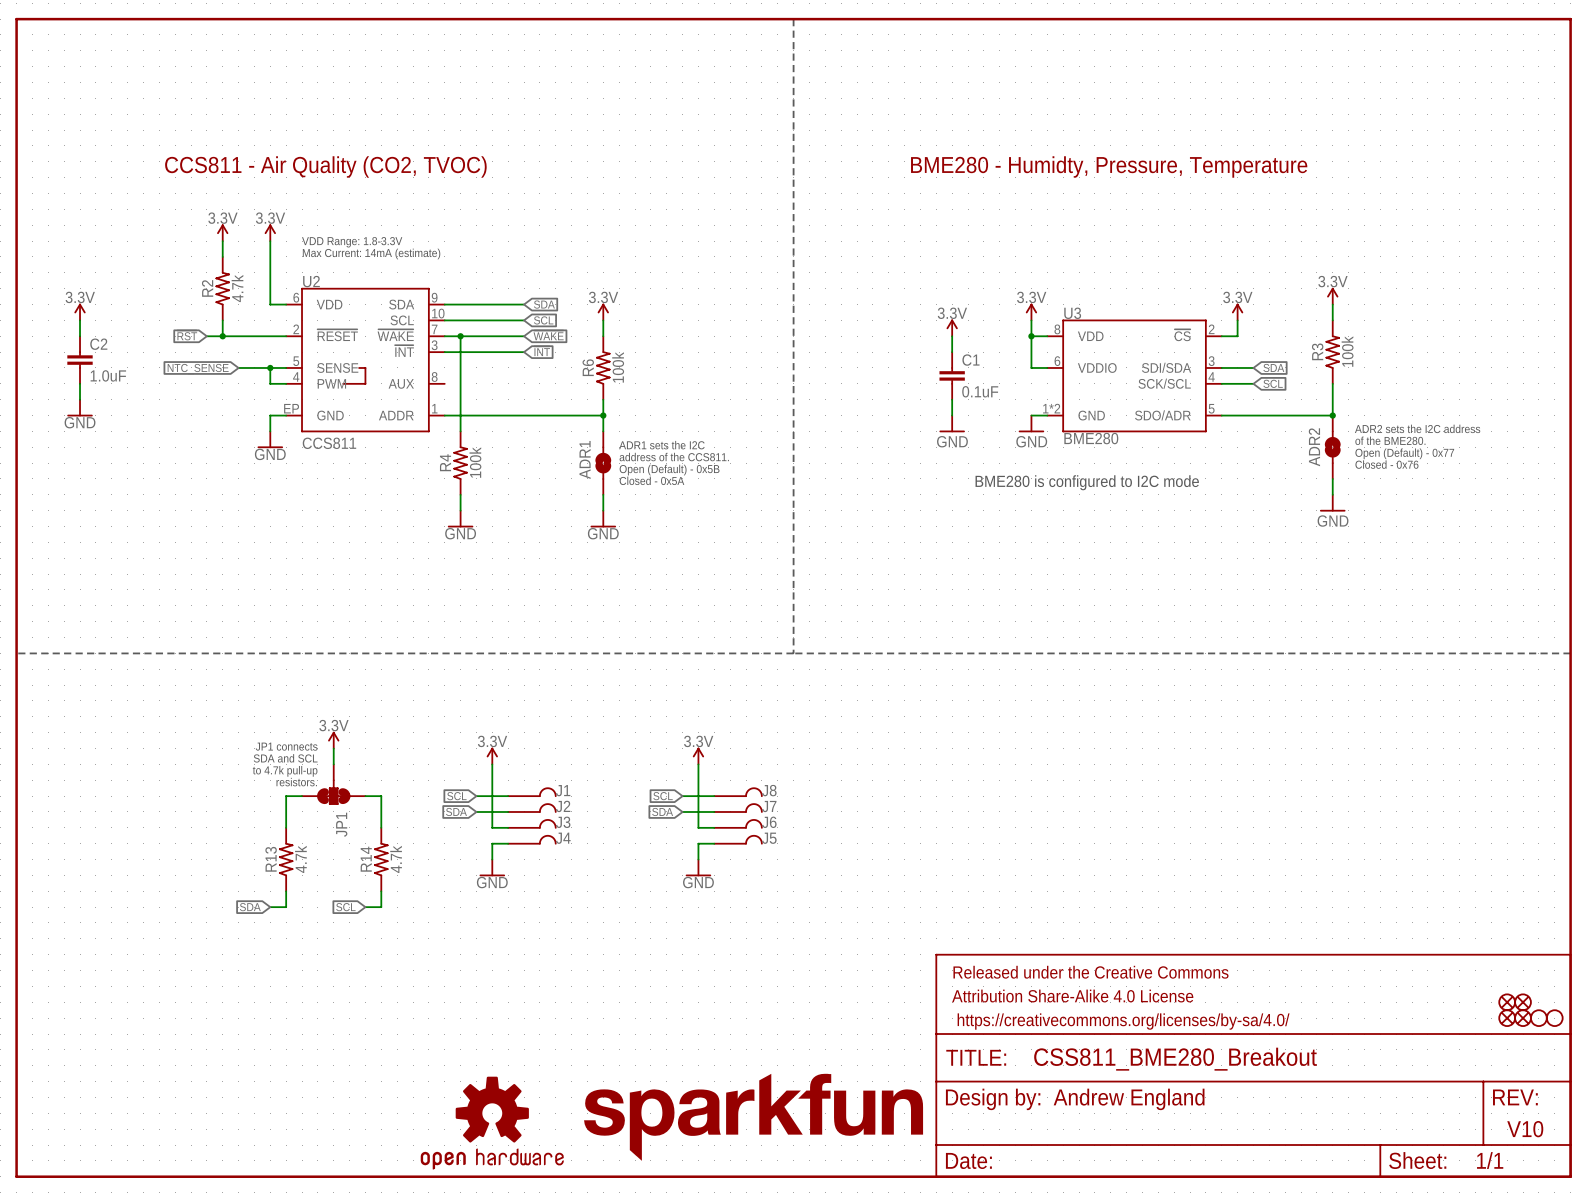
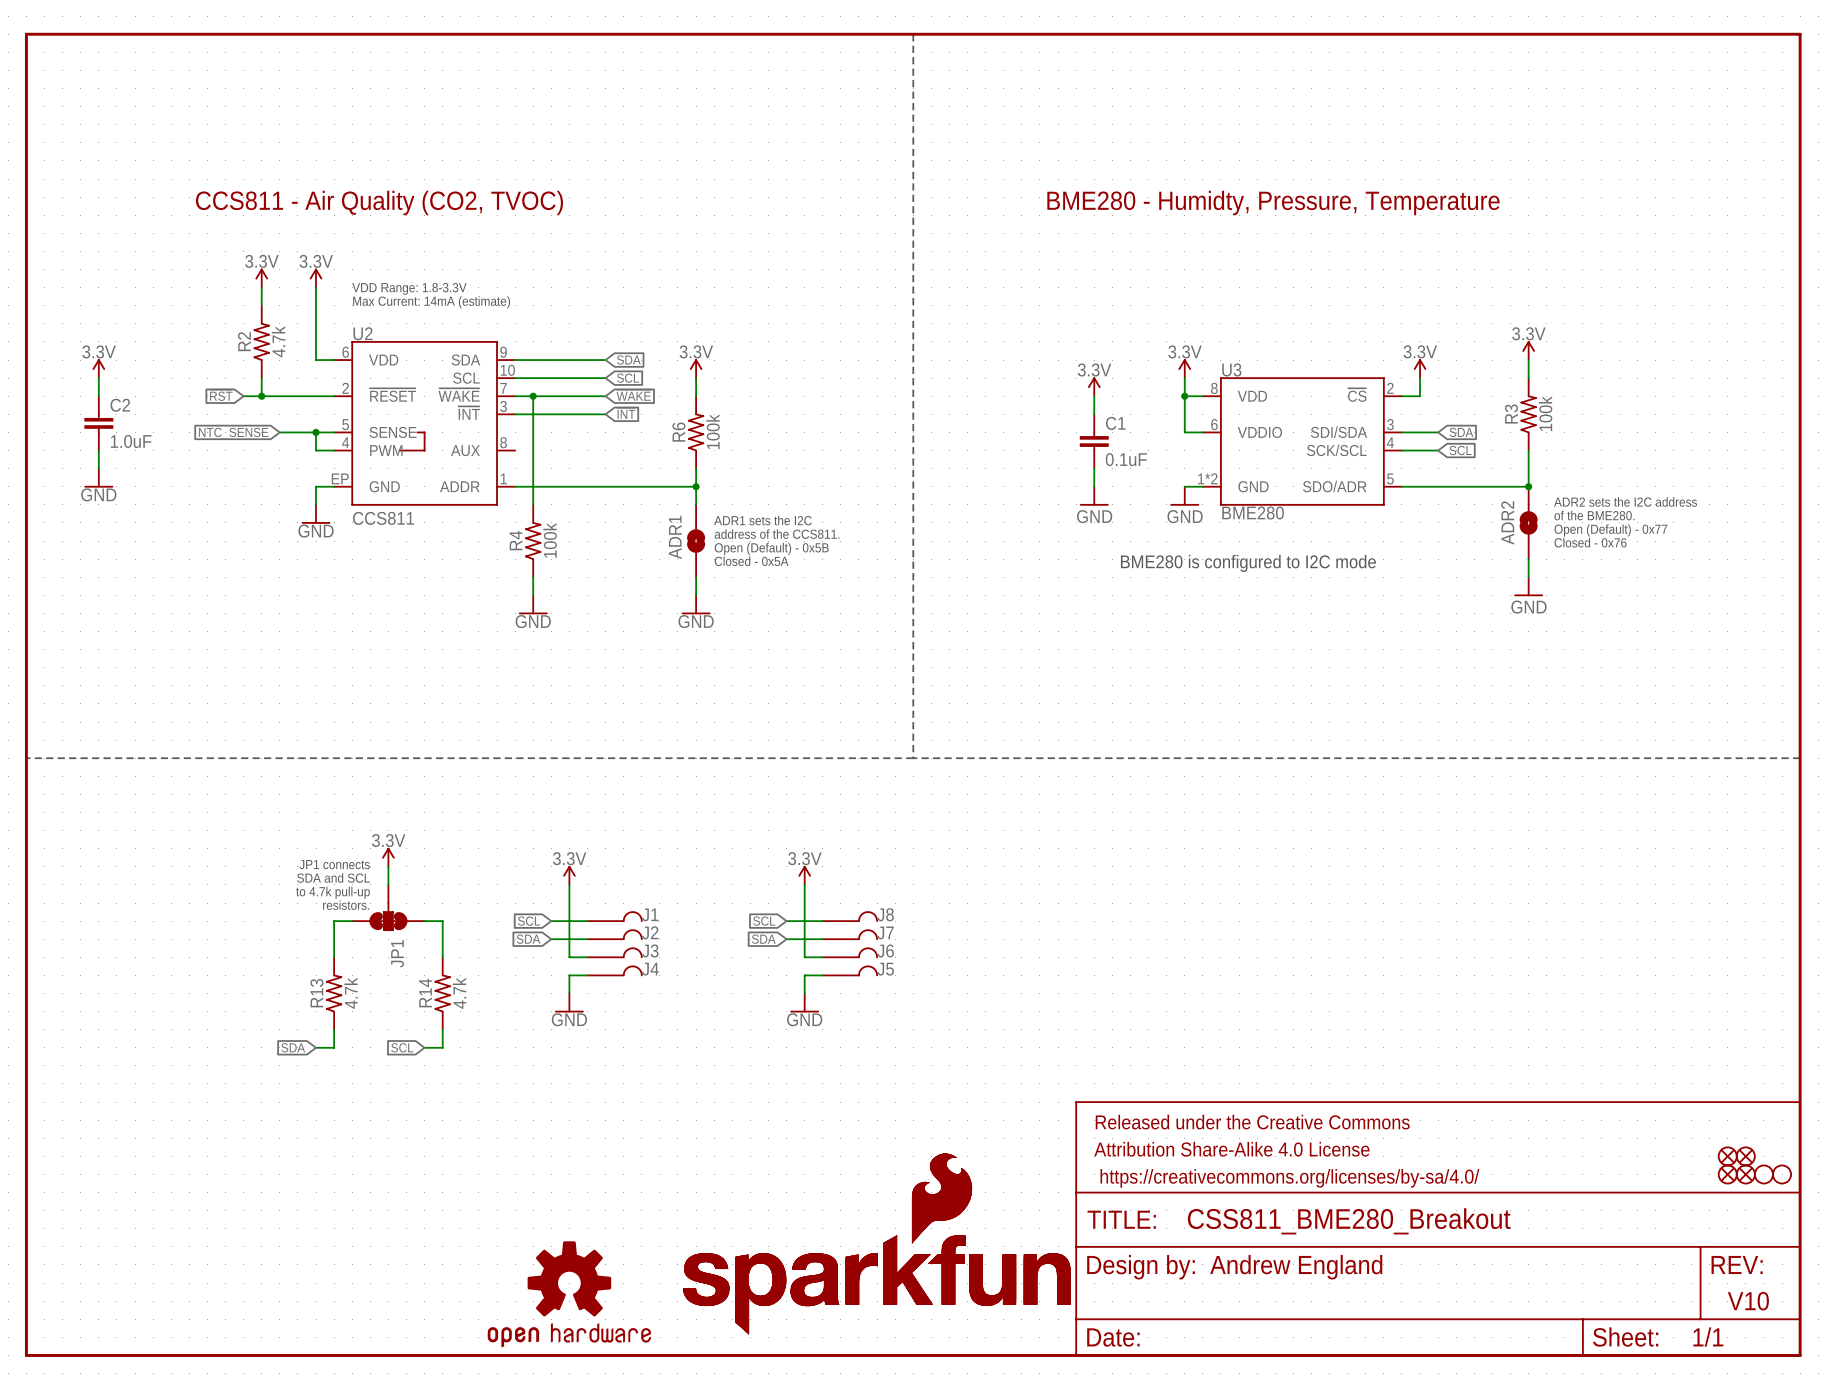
part: none -> (876, 1244)
part: (753, 1117) -> none

